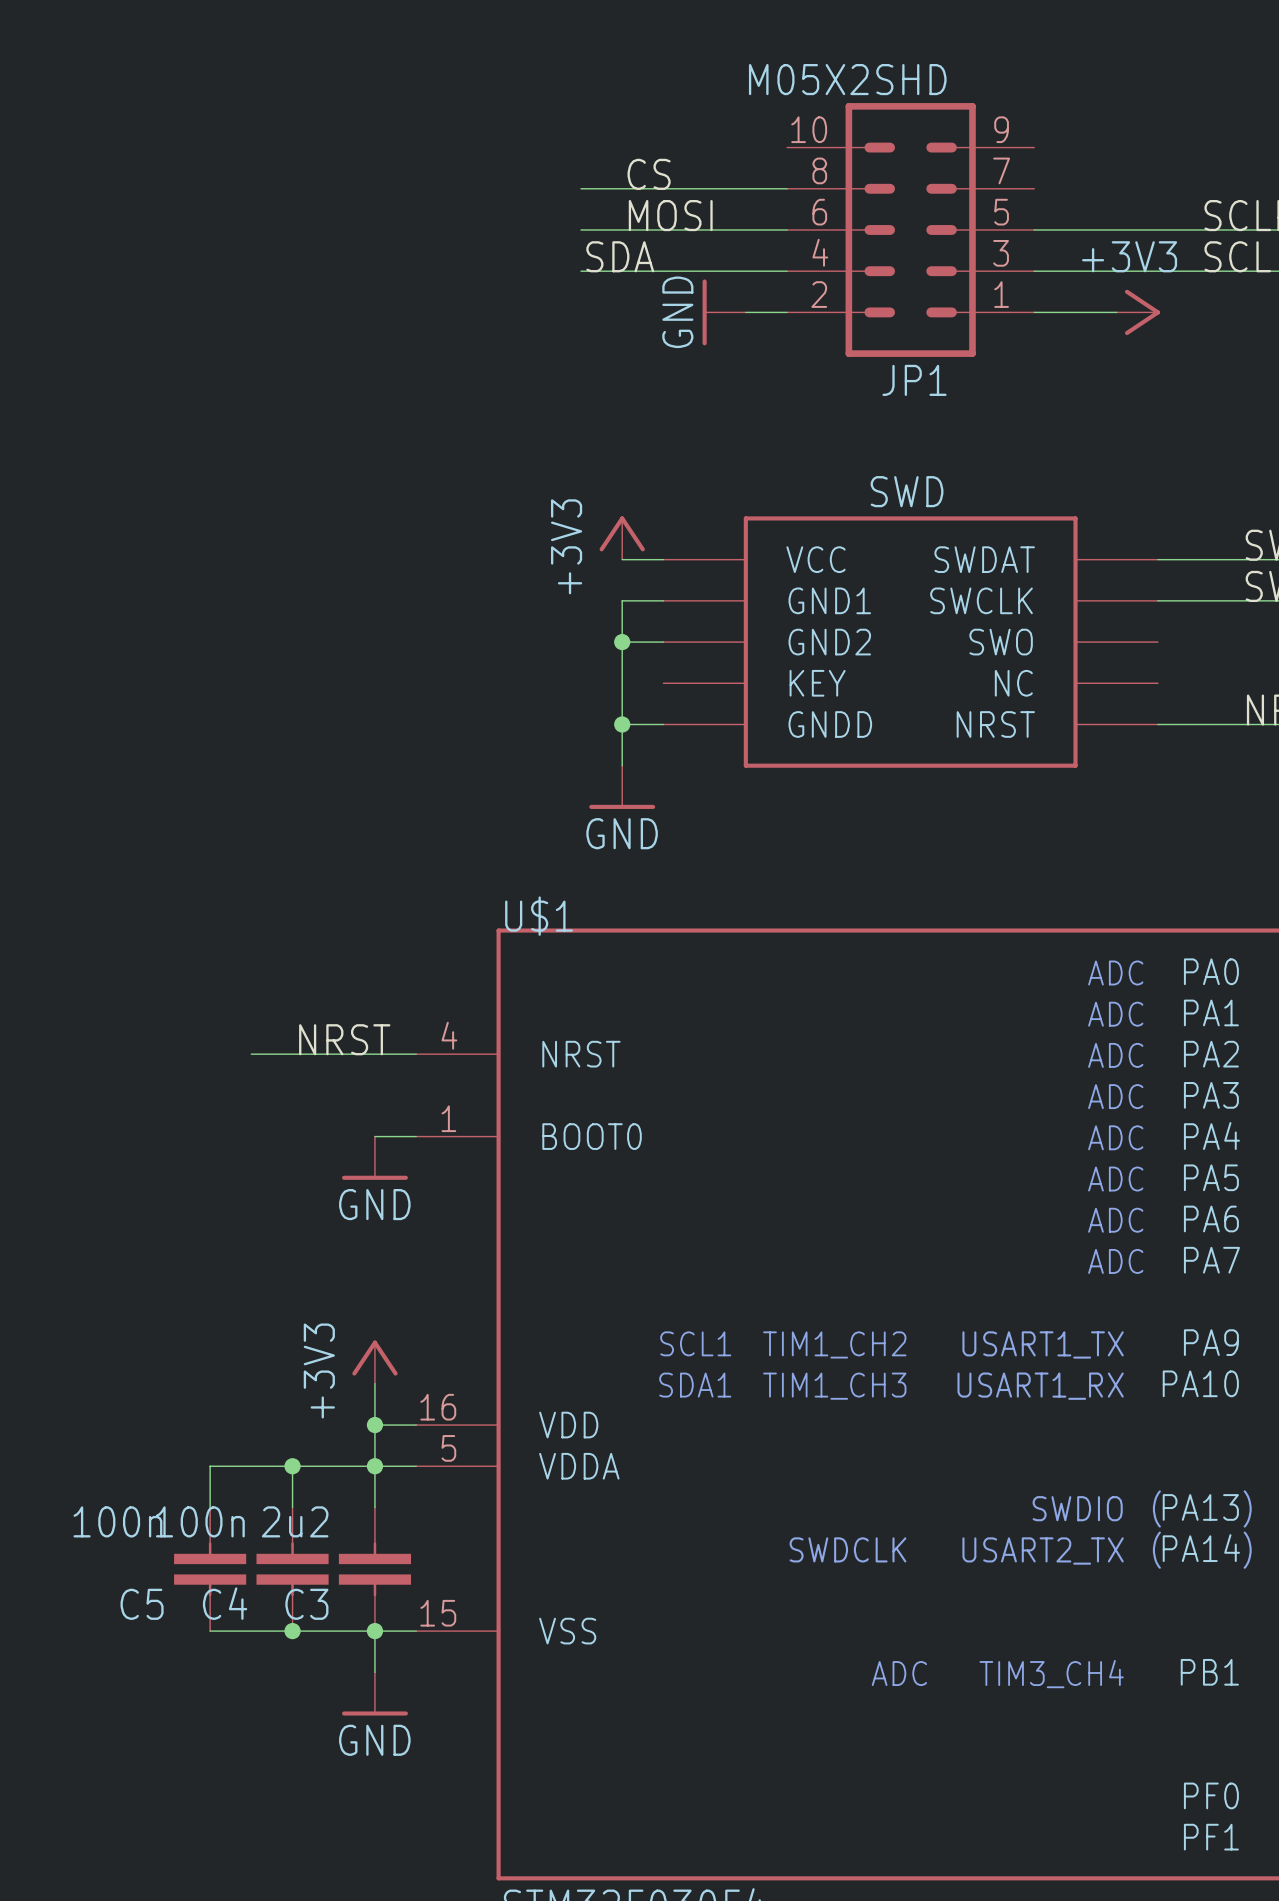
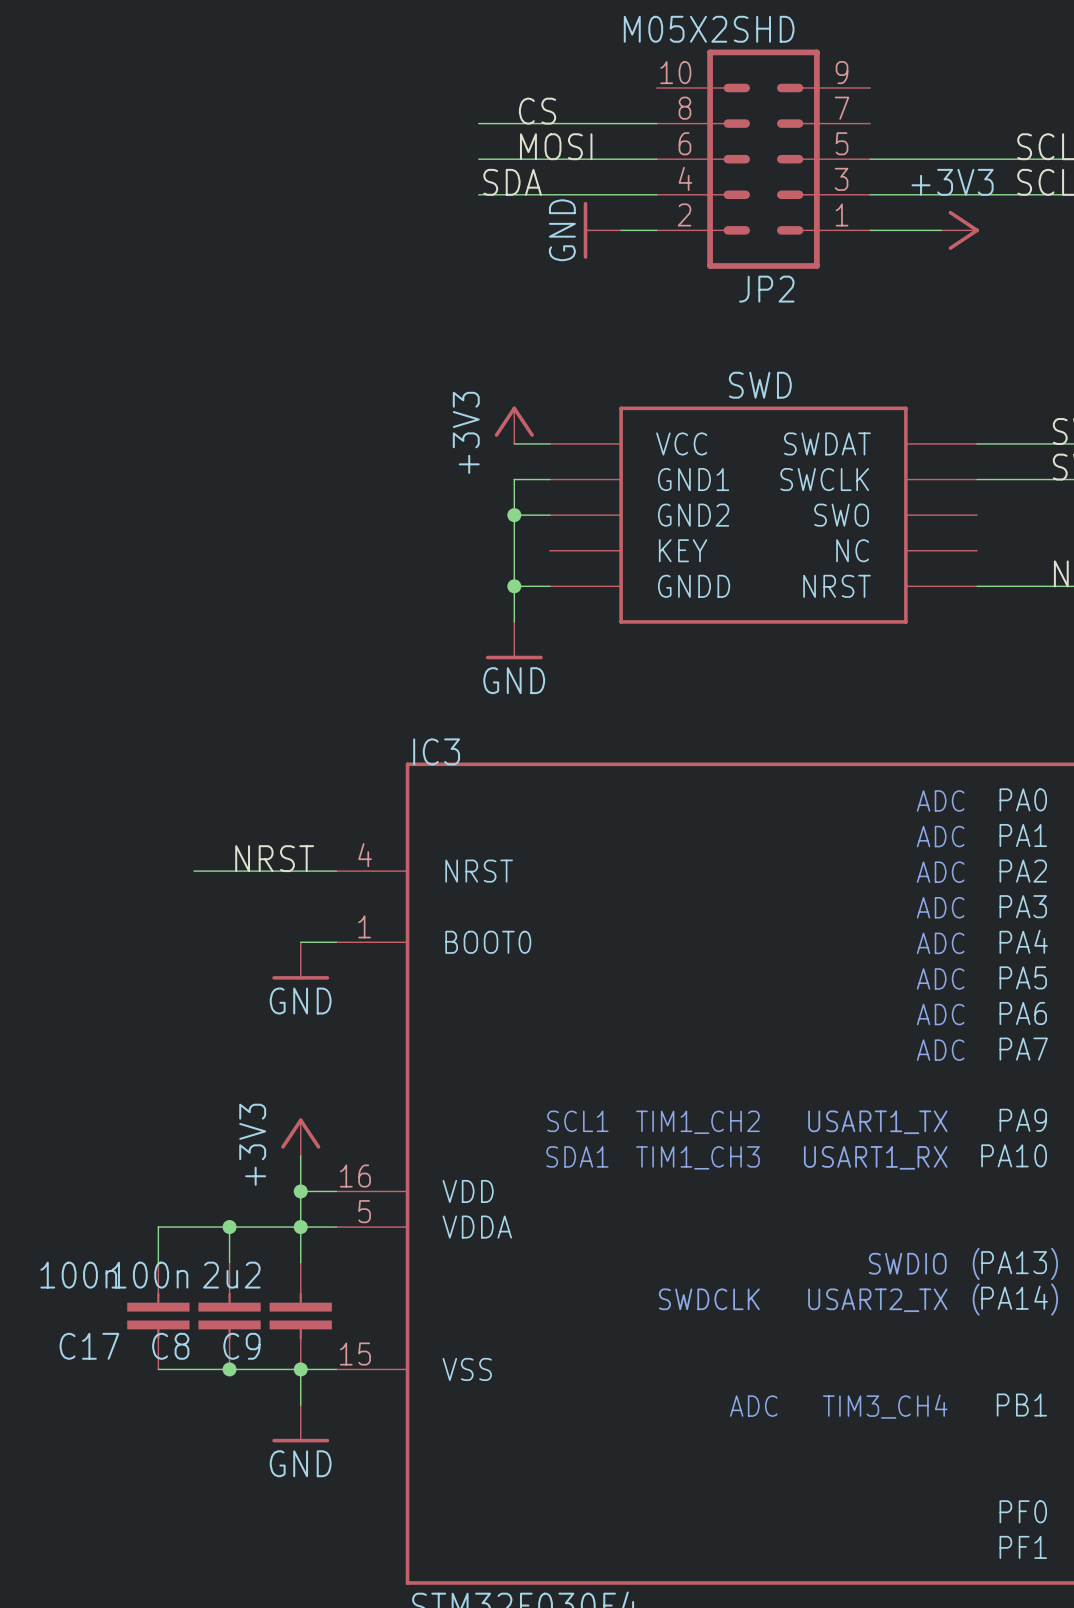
JP1 name: JP1 (914, 380) -> JP2 (766, 289)
U$1 name: U$1 (539, 916) -> IC3 (436, 751)
C4 name: C4 (225, 1603) -> C8 (170, 1346)
C5 name: C5 (142, 1604) -> C17 (89, 1346)
C3 name: C3 (306, 1604) -> C9 (241, 1346)

